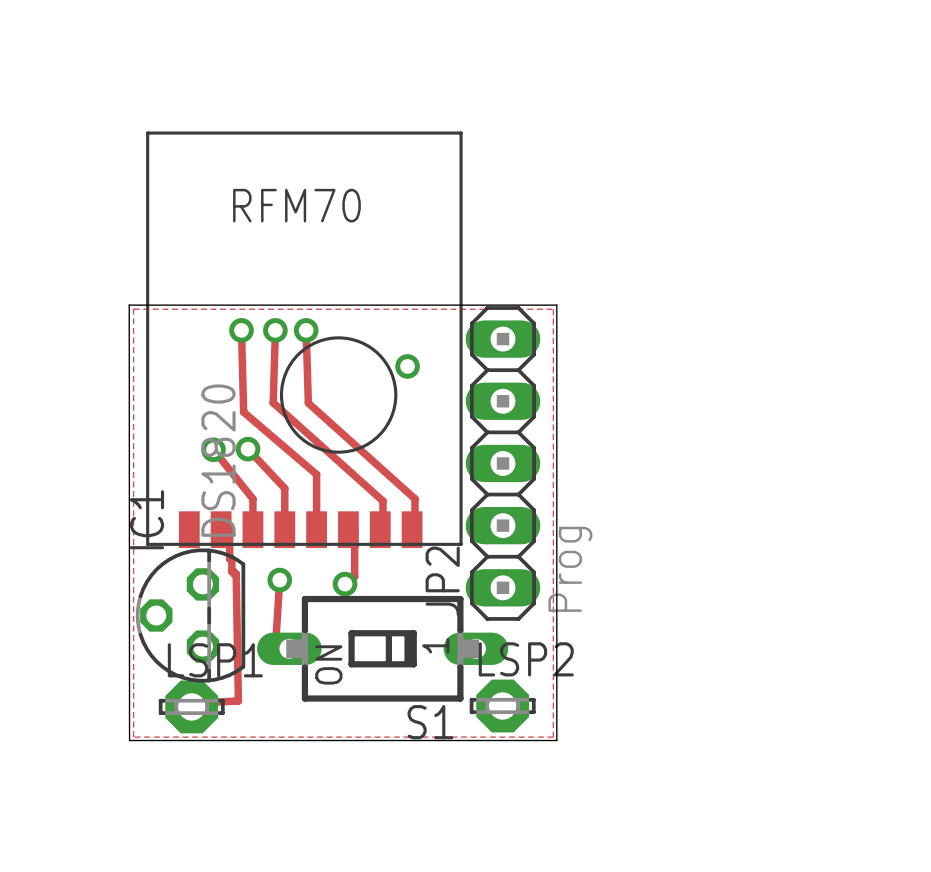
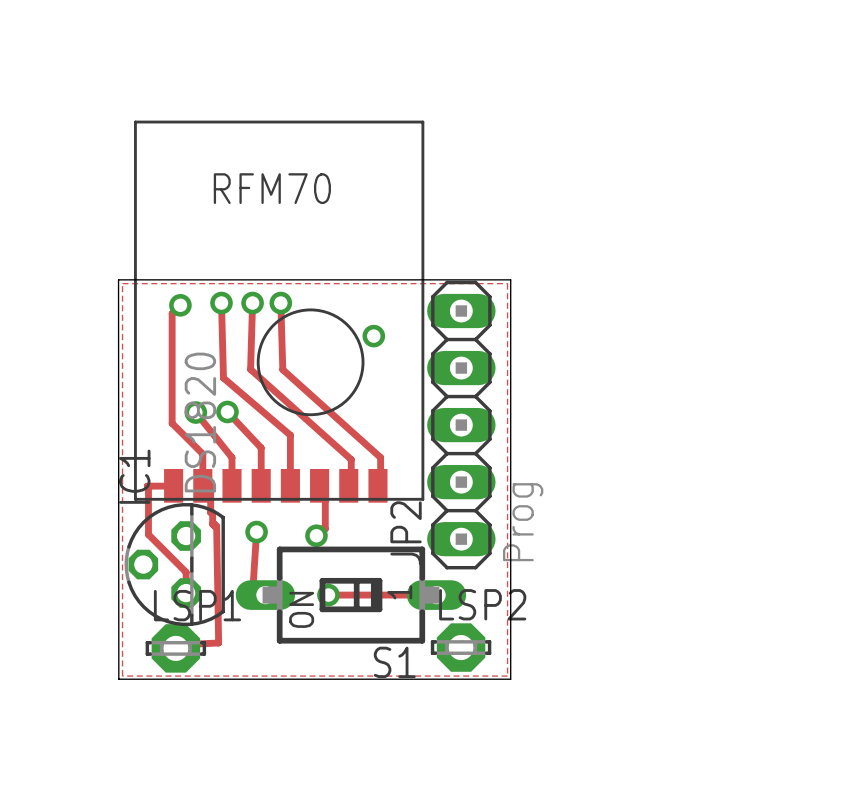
track: none -> (180, 305) (172, 313) (172, 423) (202, 454) (202, 485)
via: none -> (180, 305)
track: none -> (173, 486) (147, 486) (148, 534) (186, 572) (186, 593)
track: none -> (328, 595) (436, 595)
via: none -> (328, 595)

